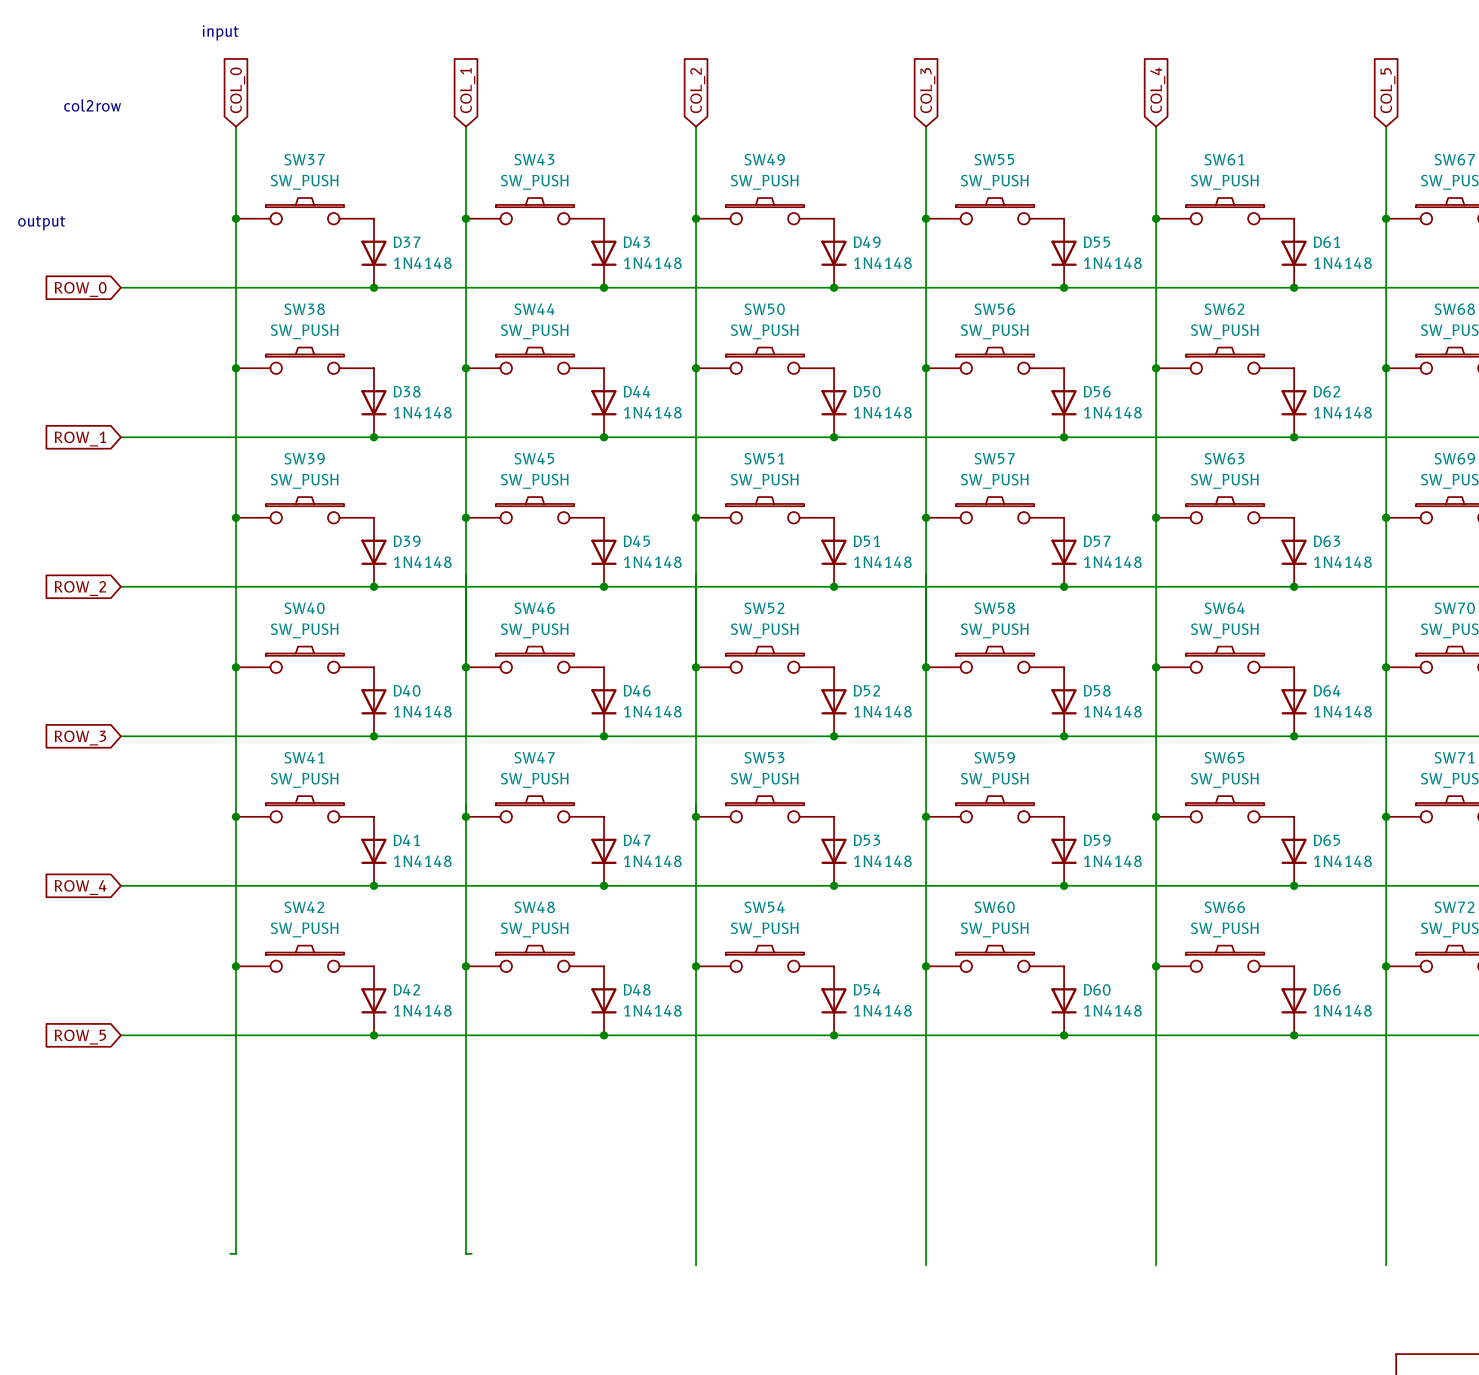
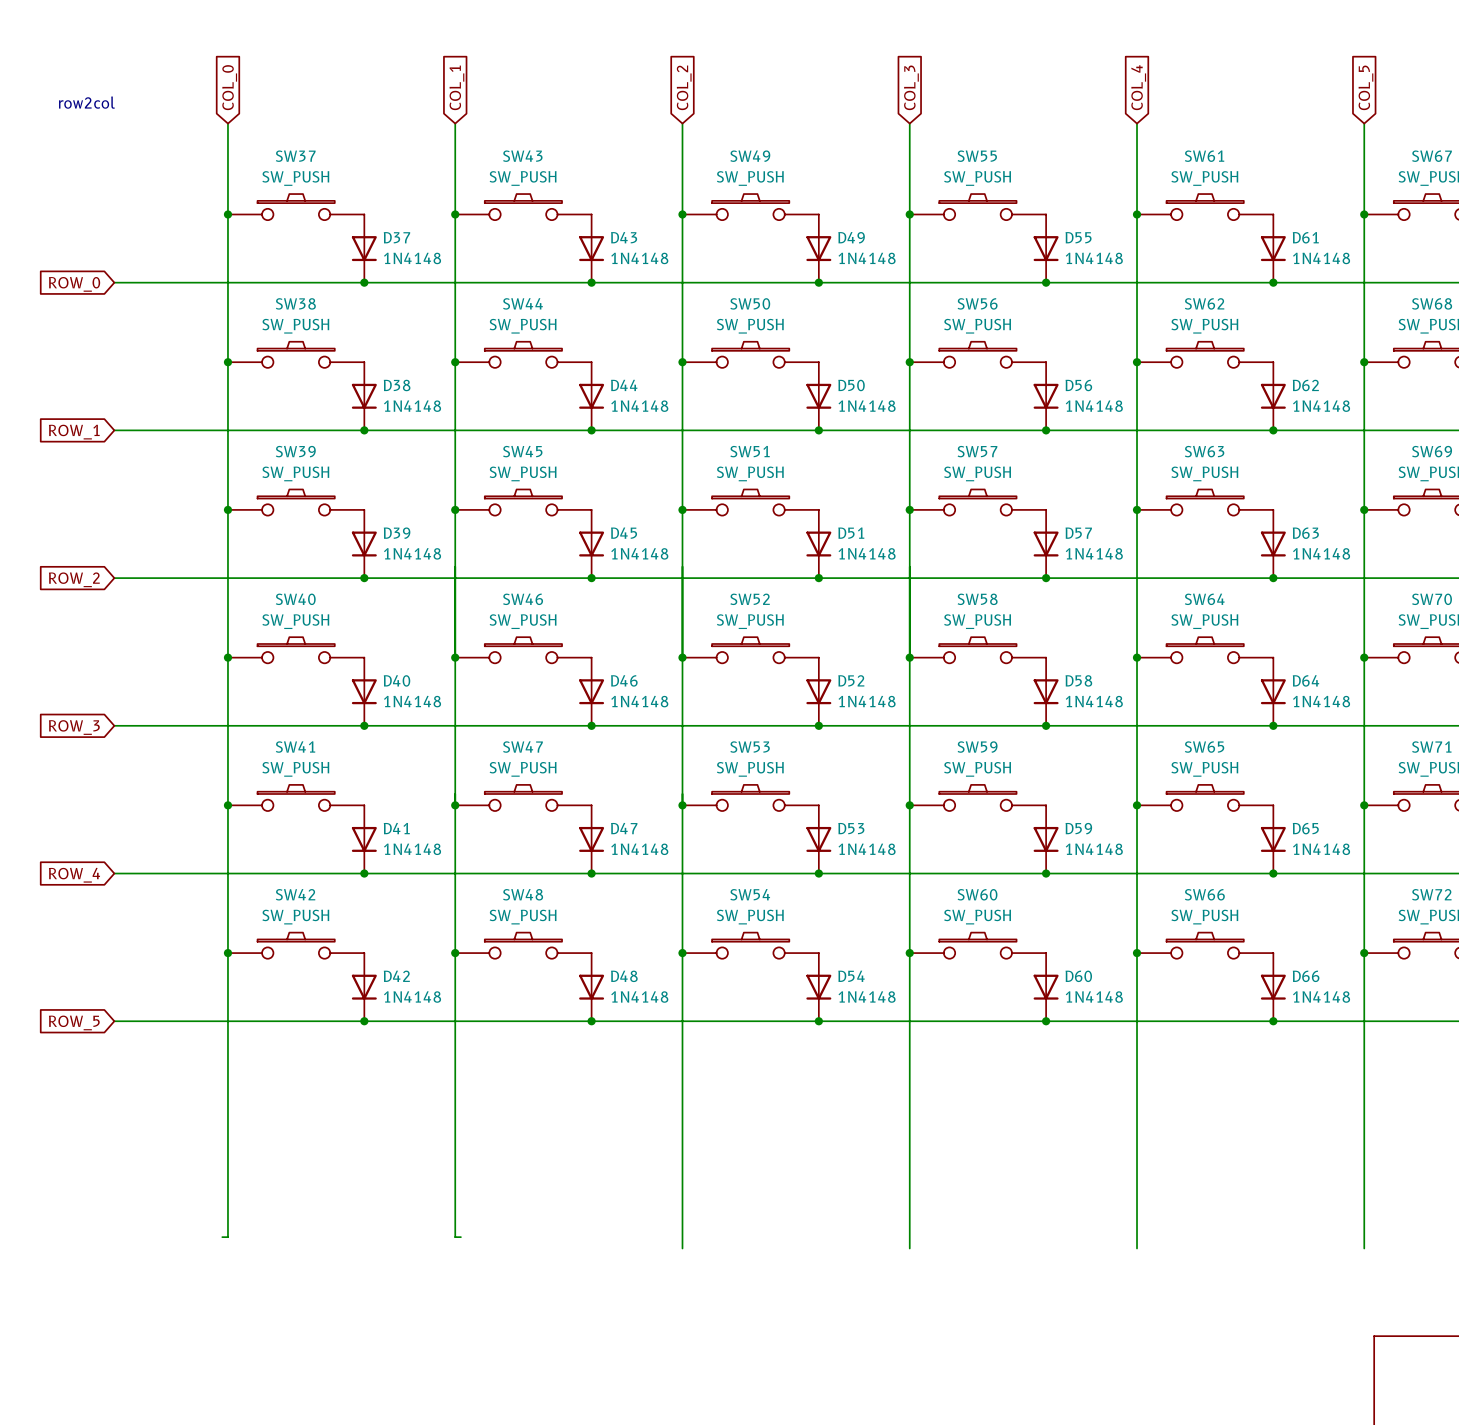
text: input (220, 32) -> none
text: col2row (92, 105) -> row2col (86, 102)
text: output (41, 223) -> none

